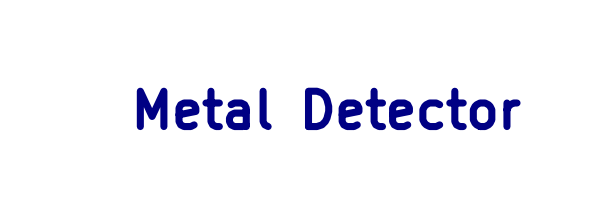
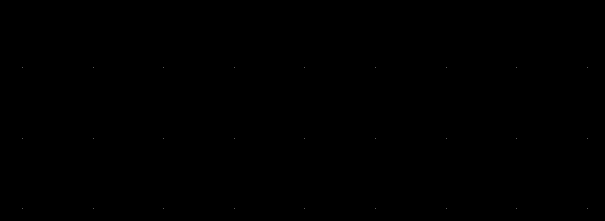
text: Metal Detector (328, 108) -> none

